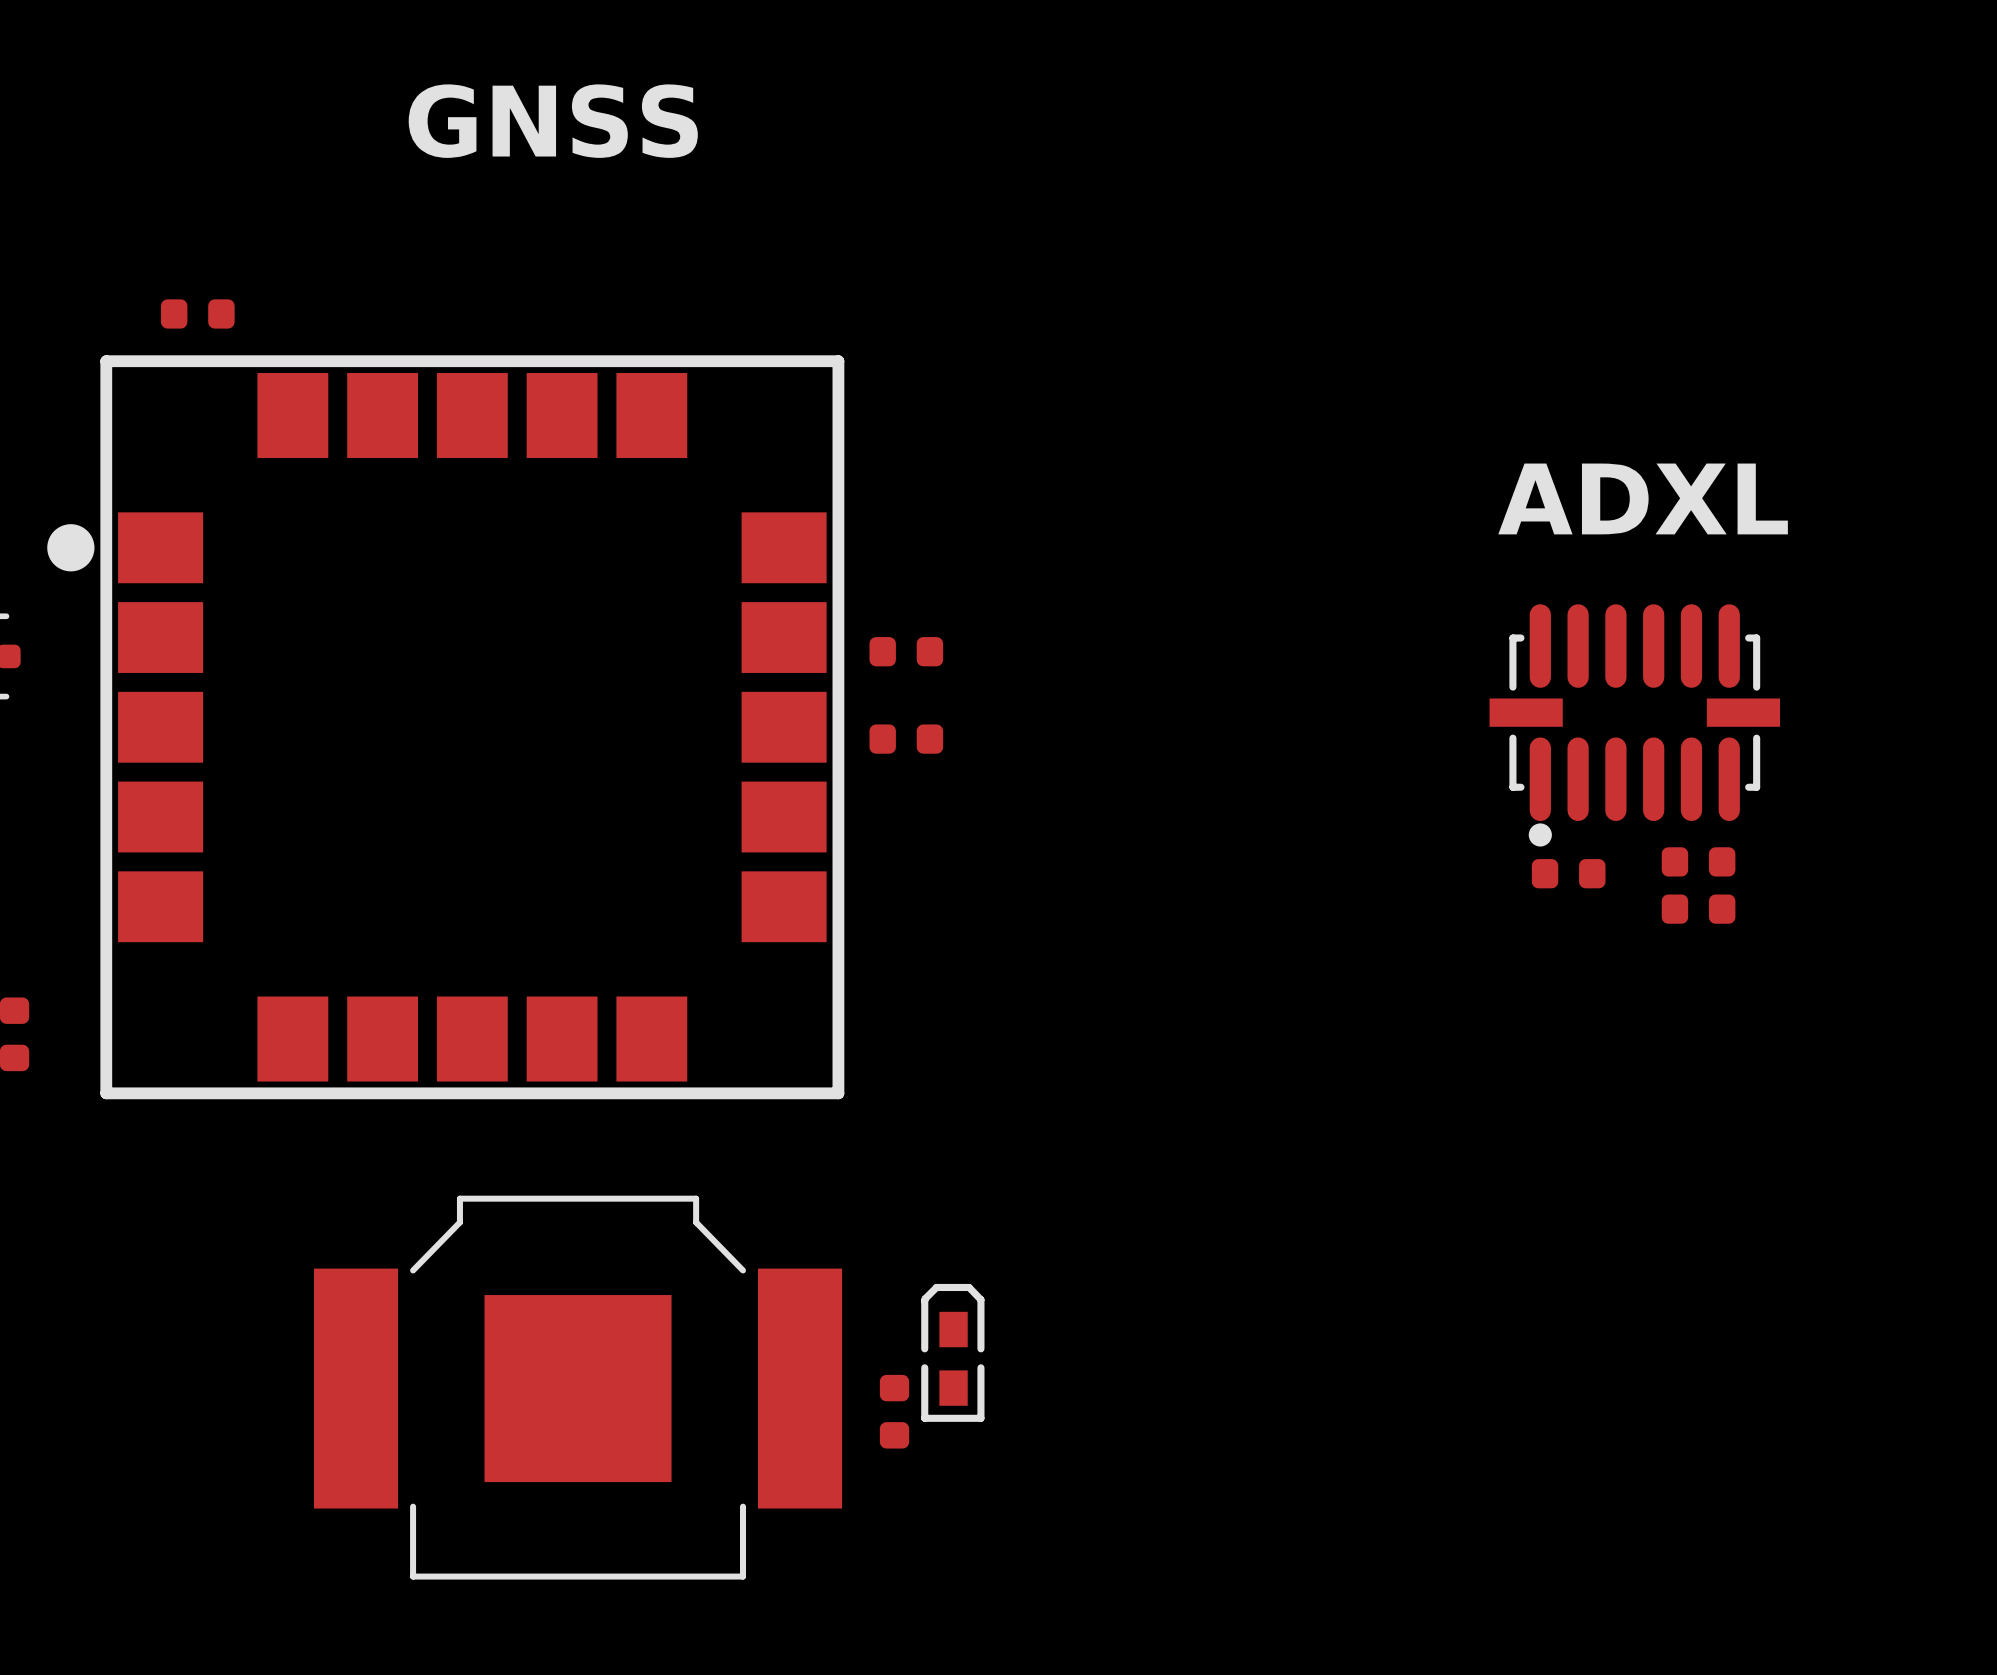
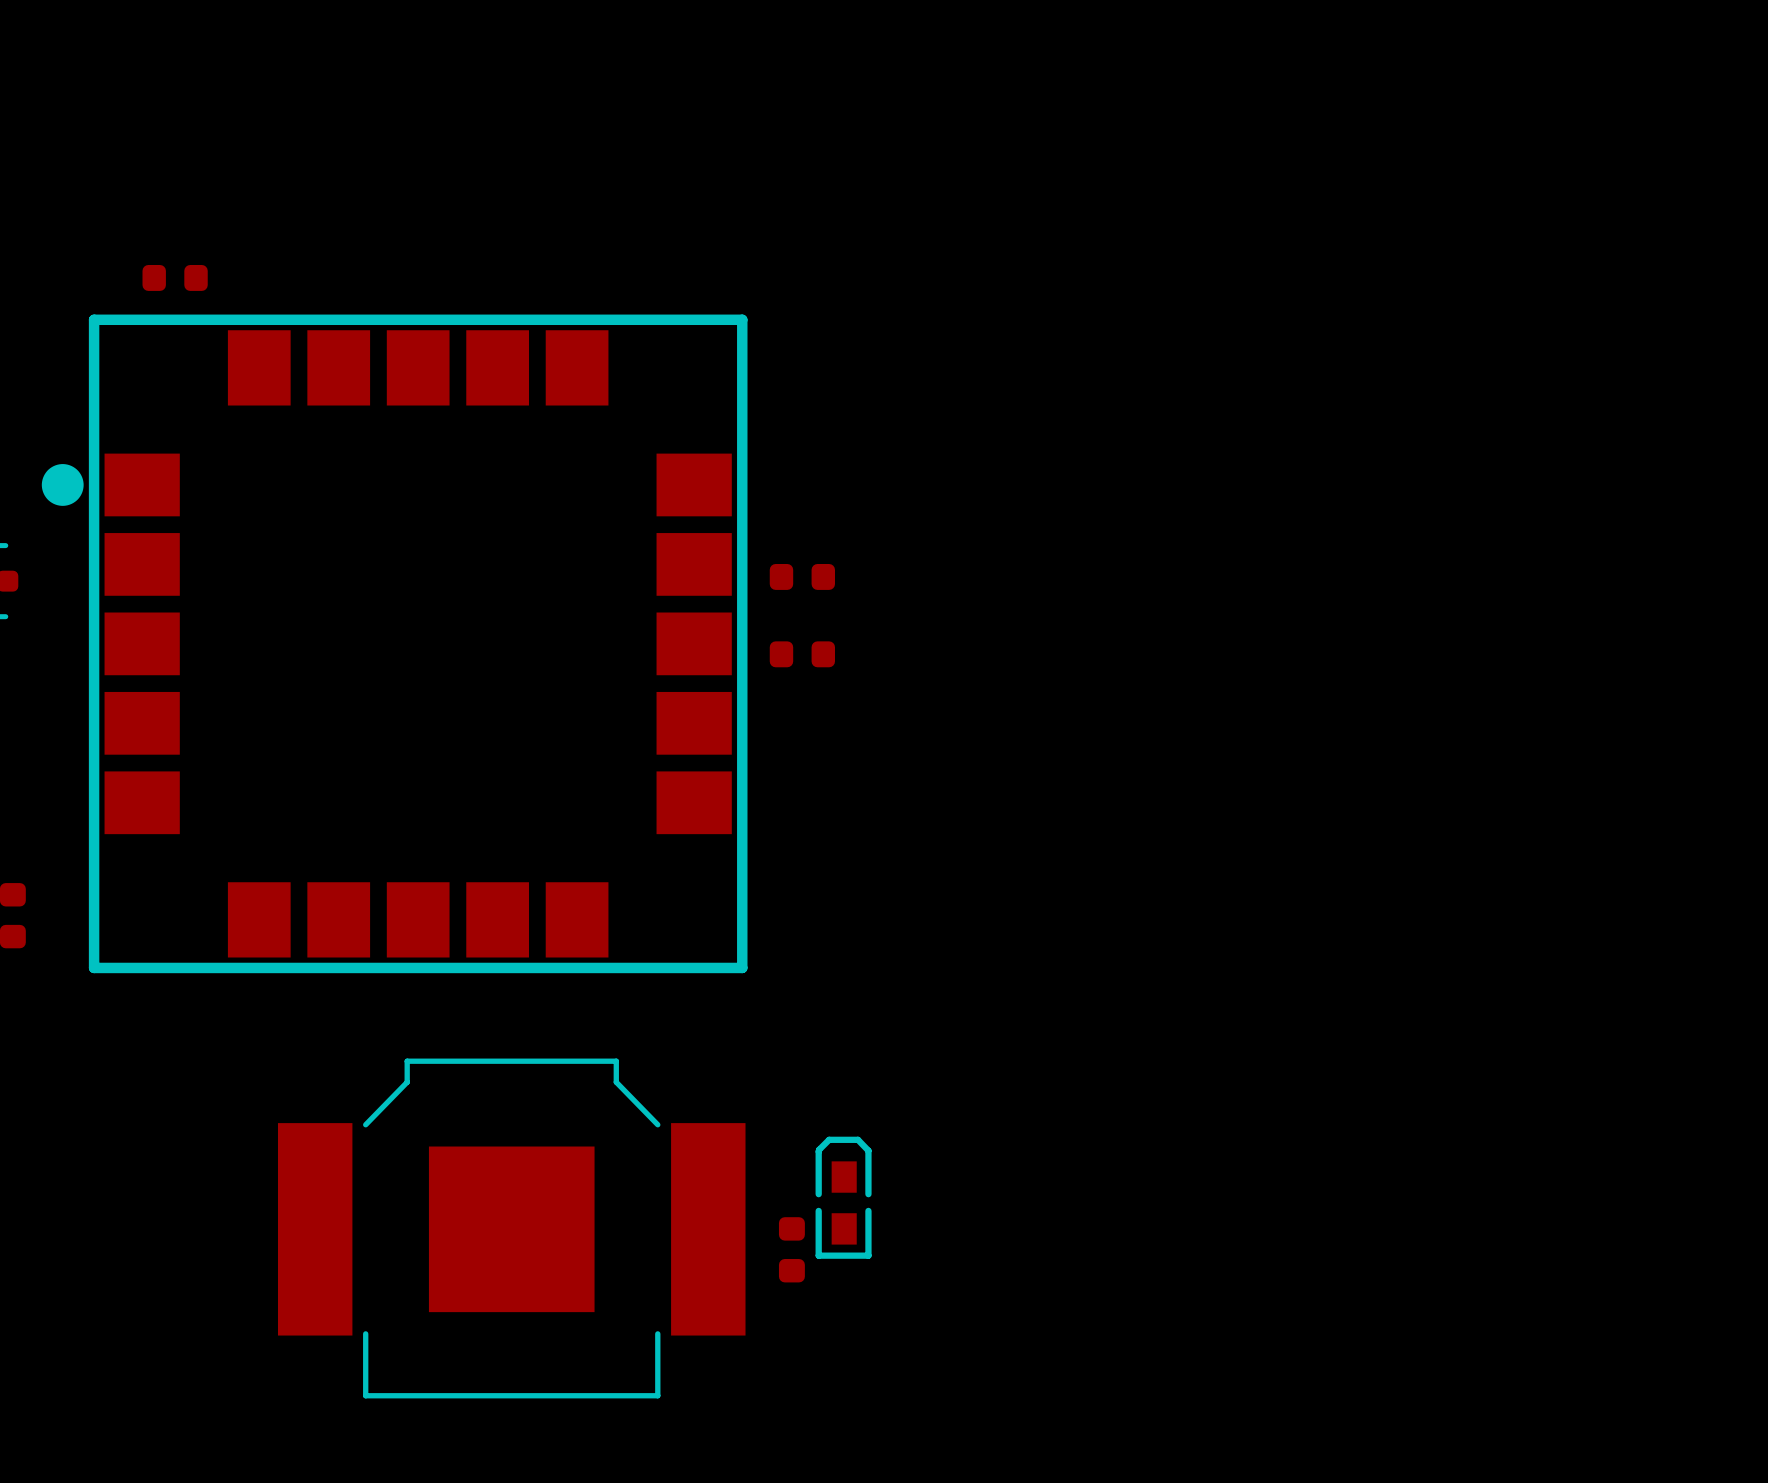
text: GNSS (553, 121) -> none
text: ADXL (1643, 498) -> none
part: (1634, 725) -> none
part: (1698, 861) -> none
part: (1568, 873) -> none
part: (1698, 909) -> none

